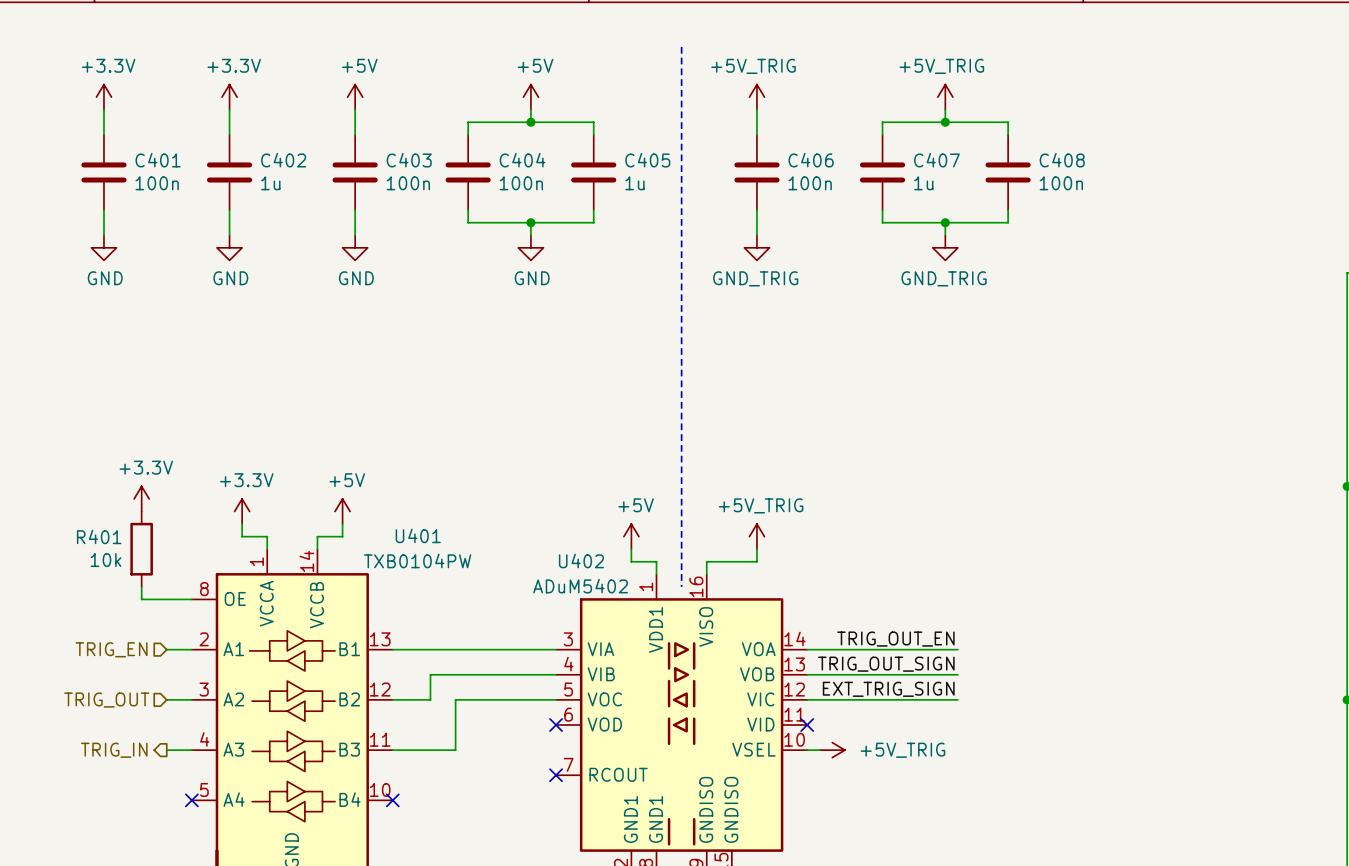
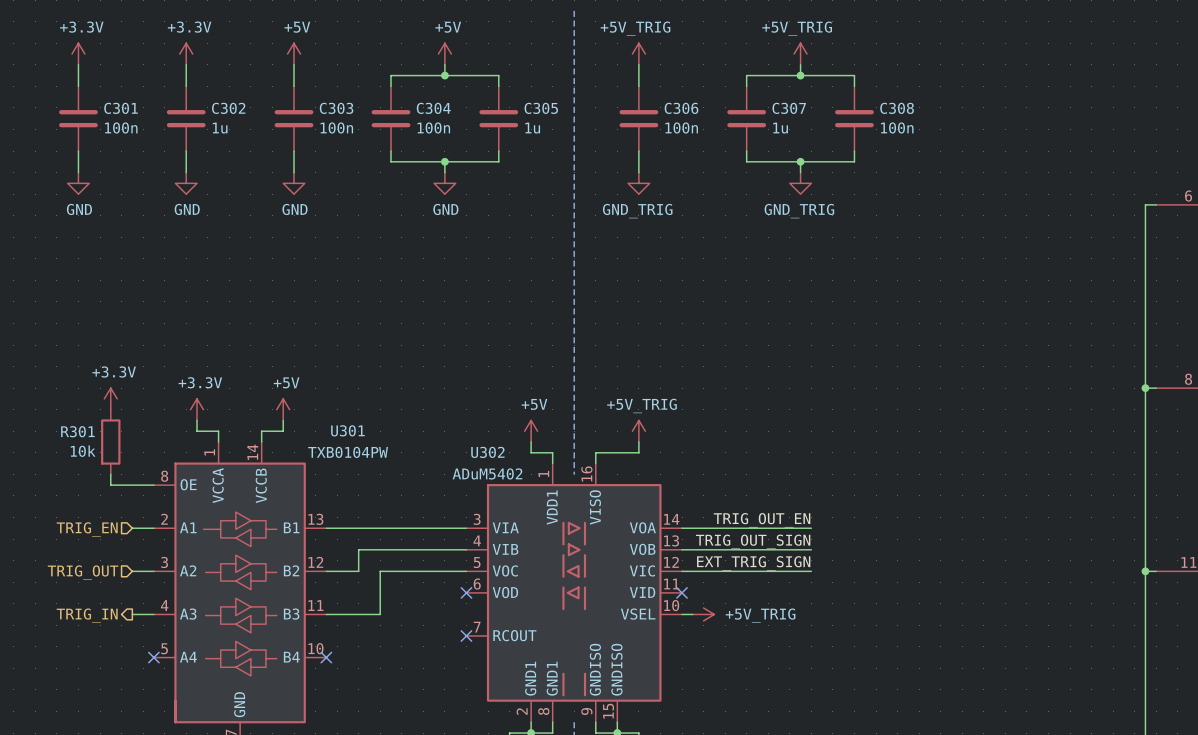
C401 name: C401 (158, 160) -> C301 (121, 108)
C402 name: C402 (283, 160) -> C302 (228, 108)
C403 name: C403 (409, 160) -> C303 (336, 108)
C404 name: C404 (522, 160) -> C304 (433, 108)
C405 name: C405 (647, 160) -> C305 (541, 108)
C406 name: C406 (811, 160) -> C306 (681, 108)
C407 name: C407 (936, 160) -> C307 (789, 108)
C408 name: C408 (1062, 160) -> C308 (897, 108)
U401 name: U401 (418, 535) -> U301 (347, 430)
R401 name: R401 (99, 536) -> R301 (77, 431)
U402 name: U402 (581, 560) -> U302 (487, 452)

